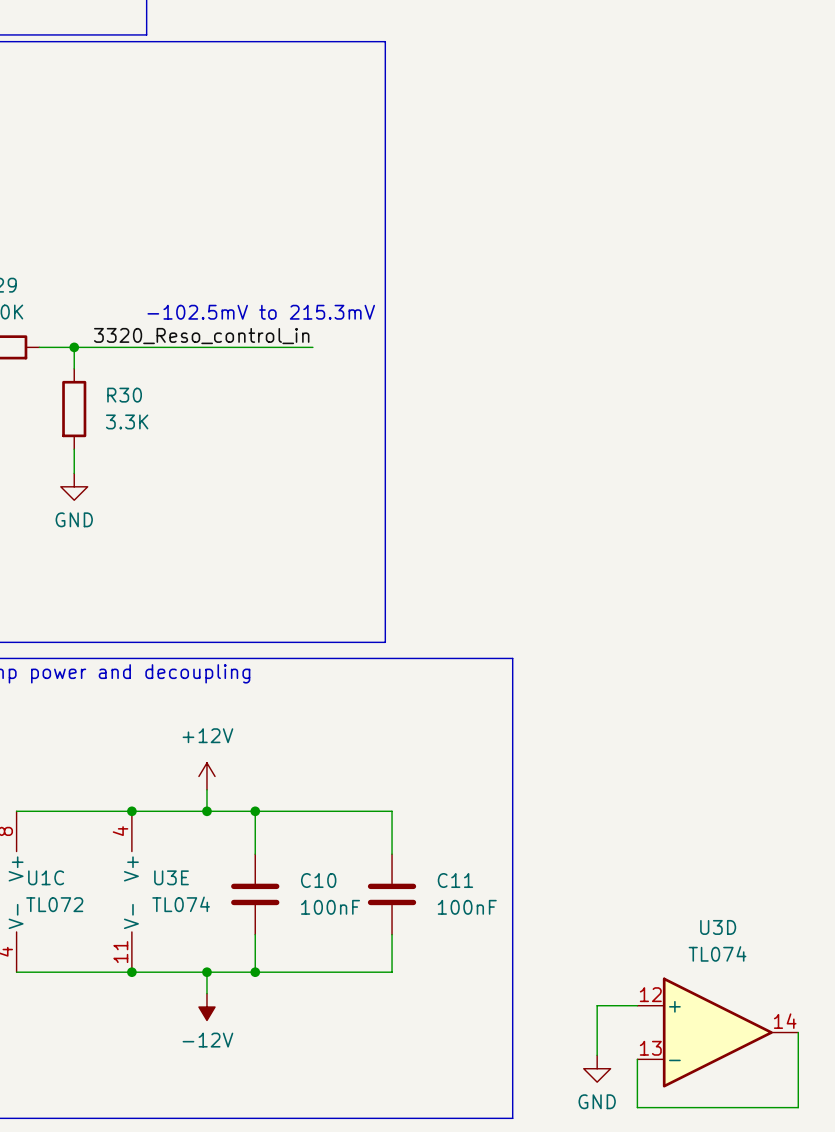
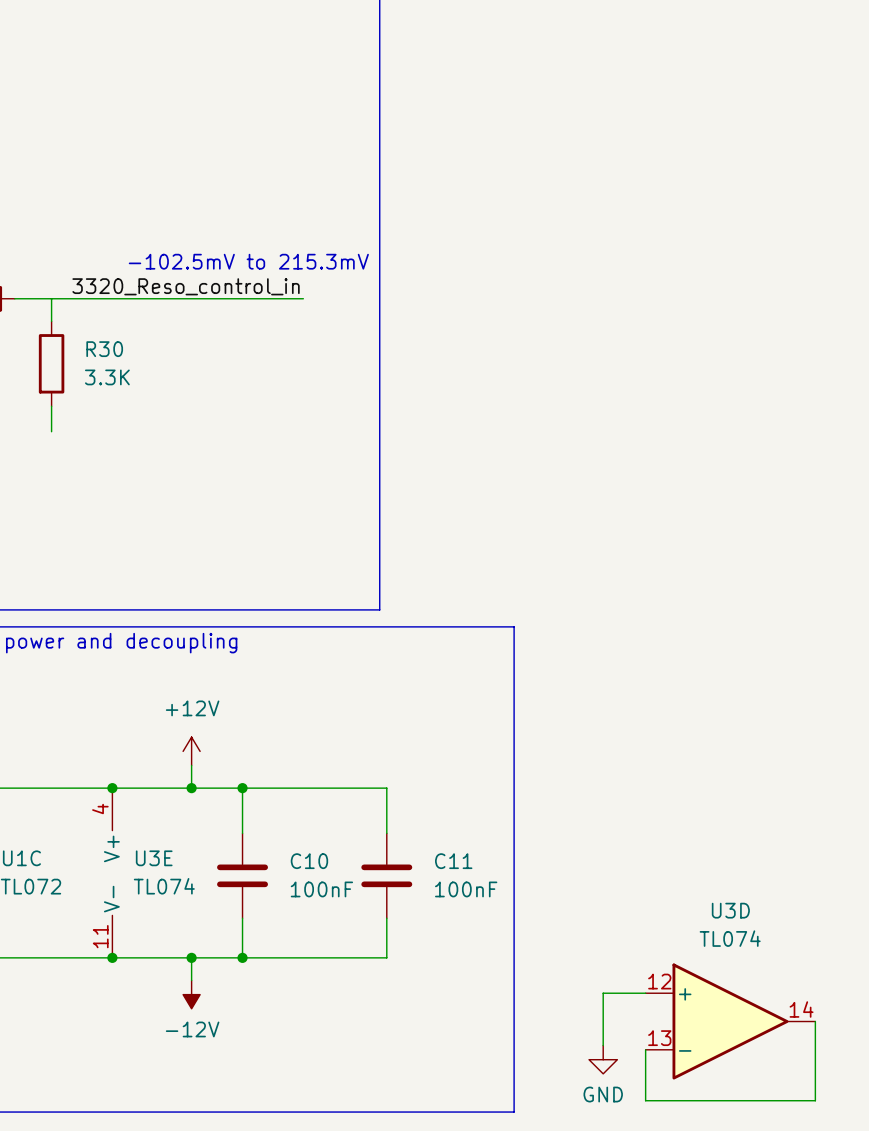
junction: (74, 347) -> none
power symbol: GND (74, 486) -> none

